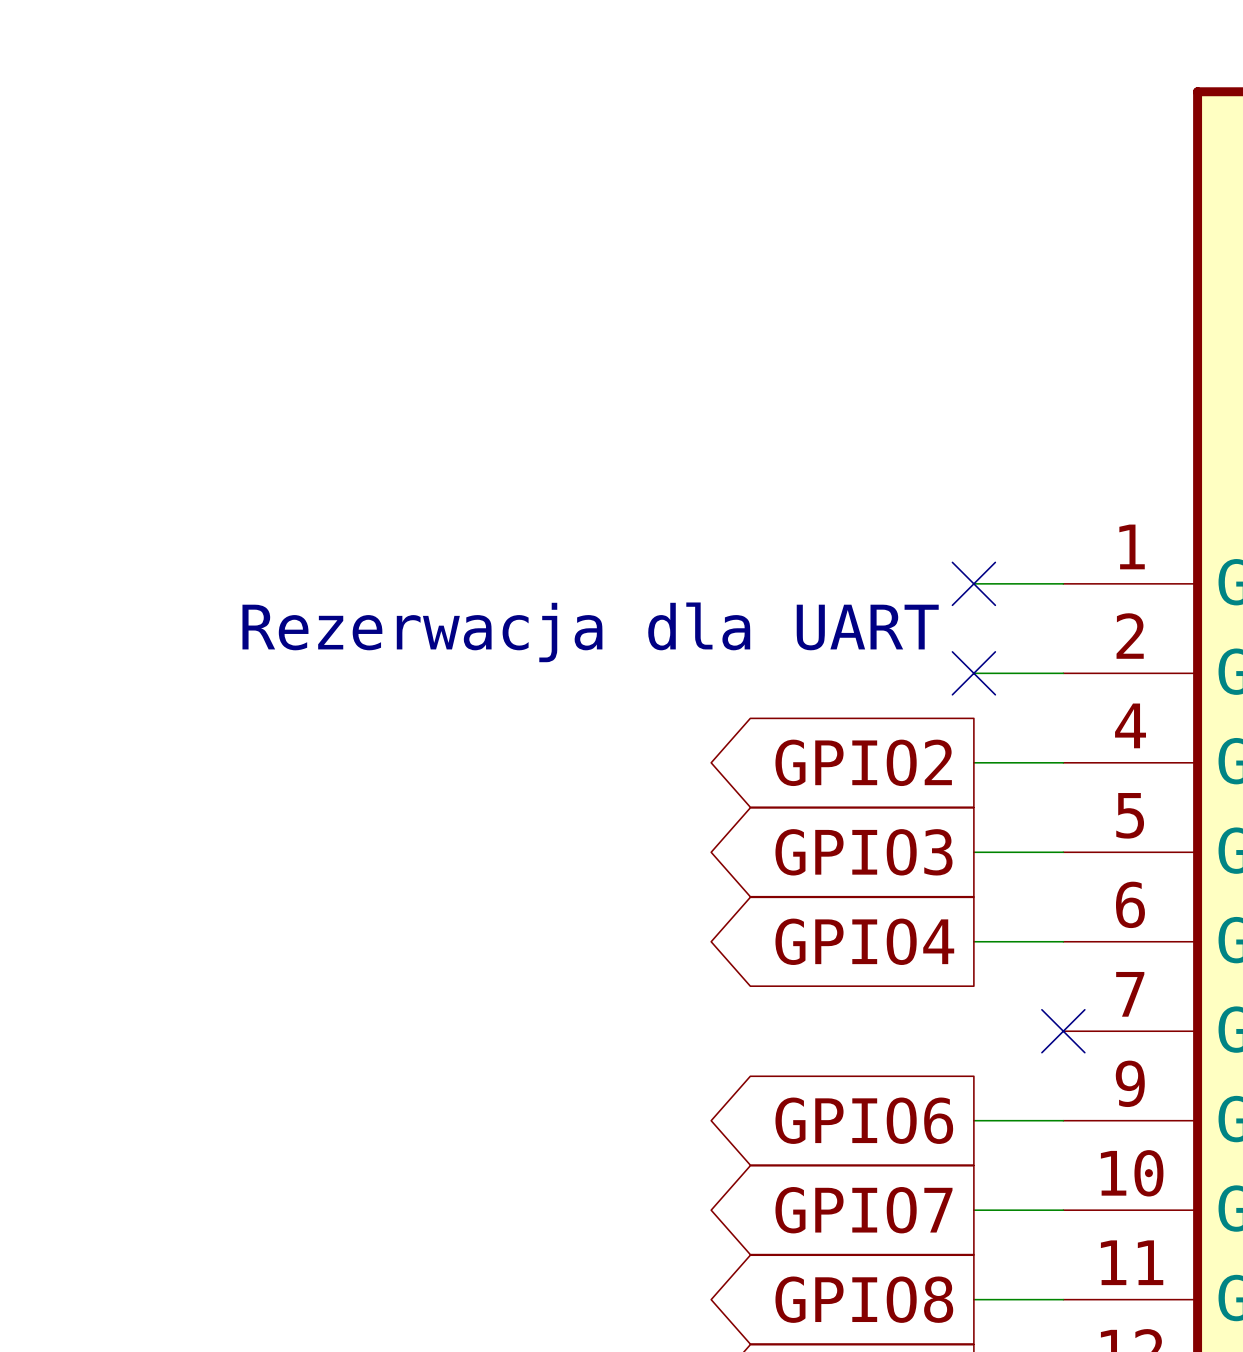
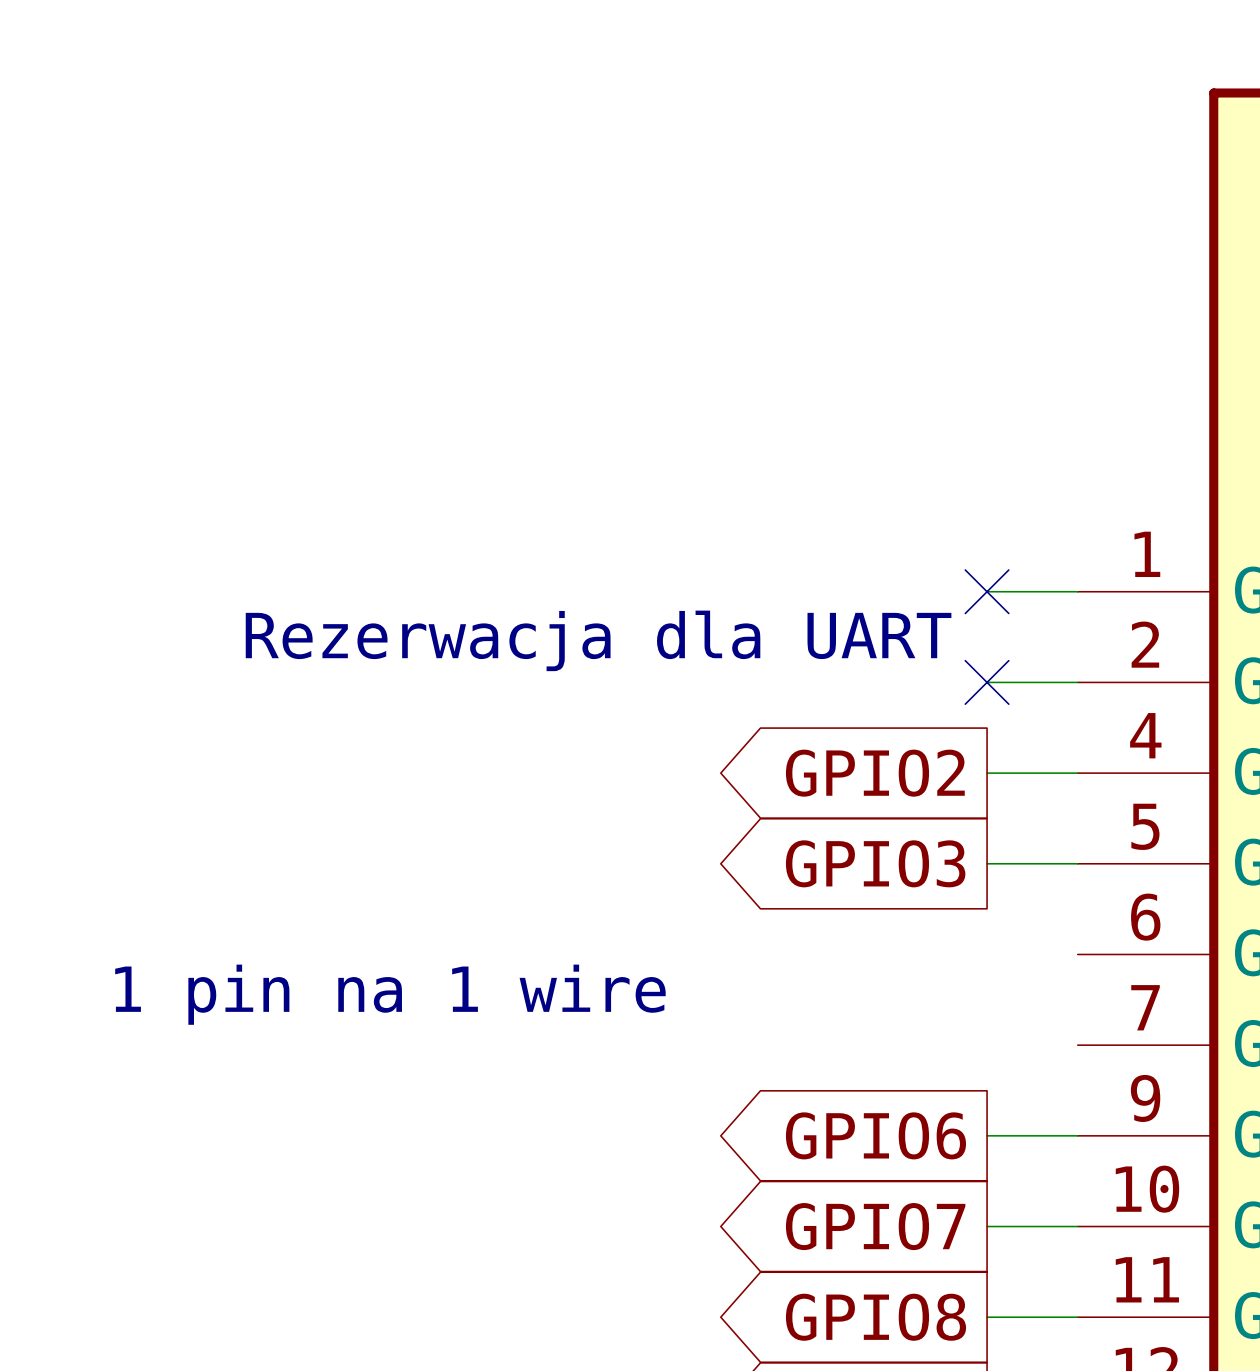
global label: GPIO4 (864, 941) -> none
wire: (973, 941) (1063, 941) -> none
text: none -> 1 pin na 1 wire (390, 994)
no-connect mark: (1063, 1031) -> none

